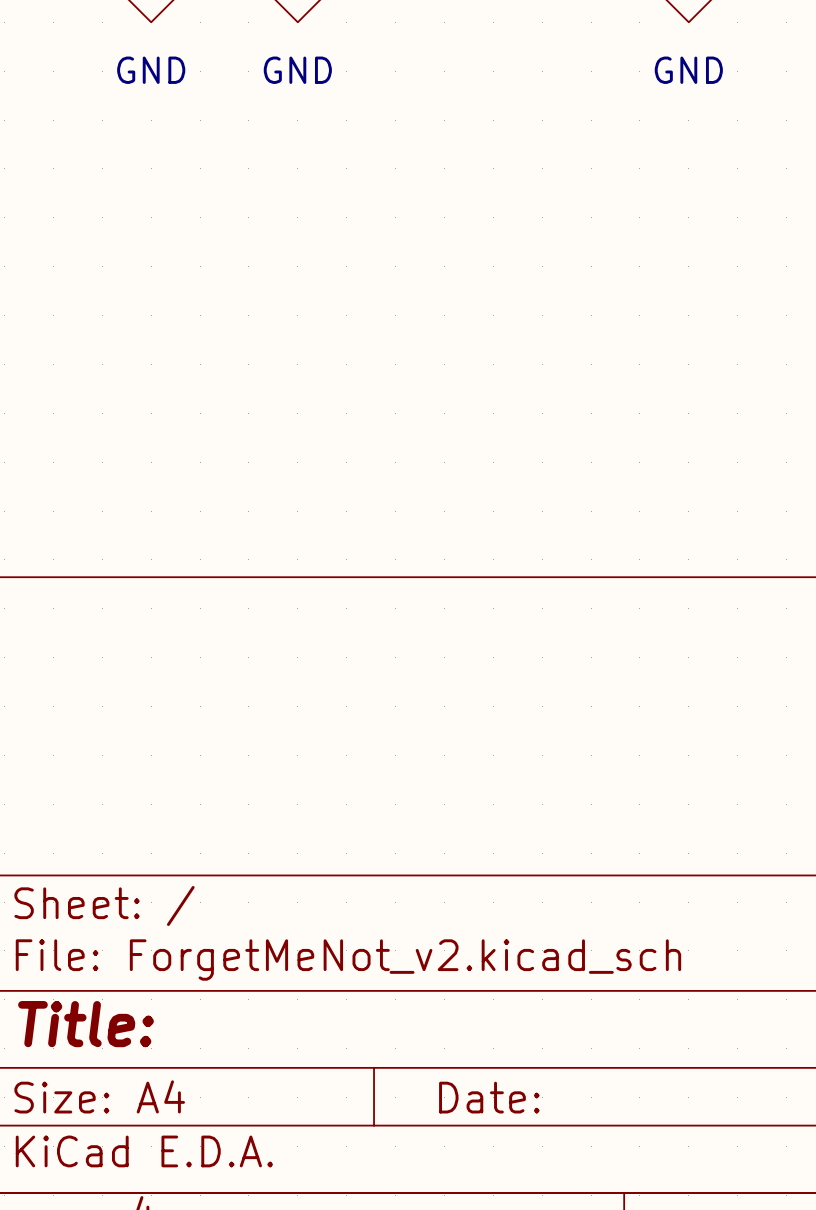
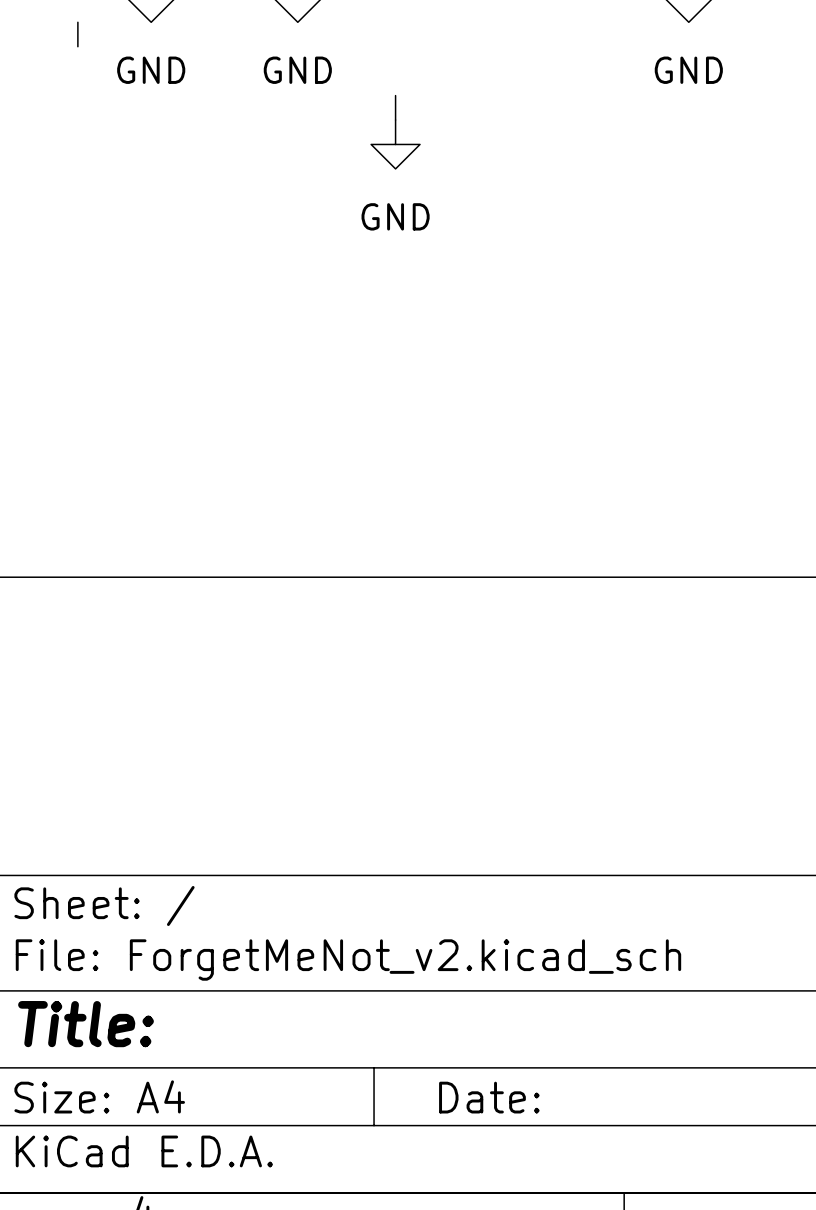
wire: none -> (77, 22) (77, 46)
wire: none -> (395, 95) (395, 120)
power symbol: none -> GND (395, 144)

